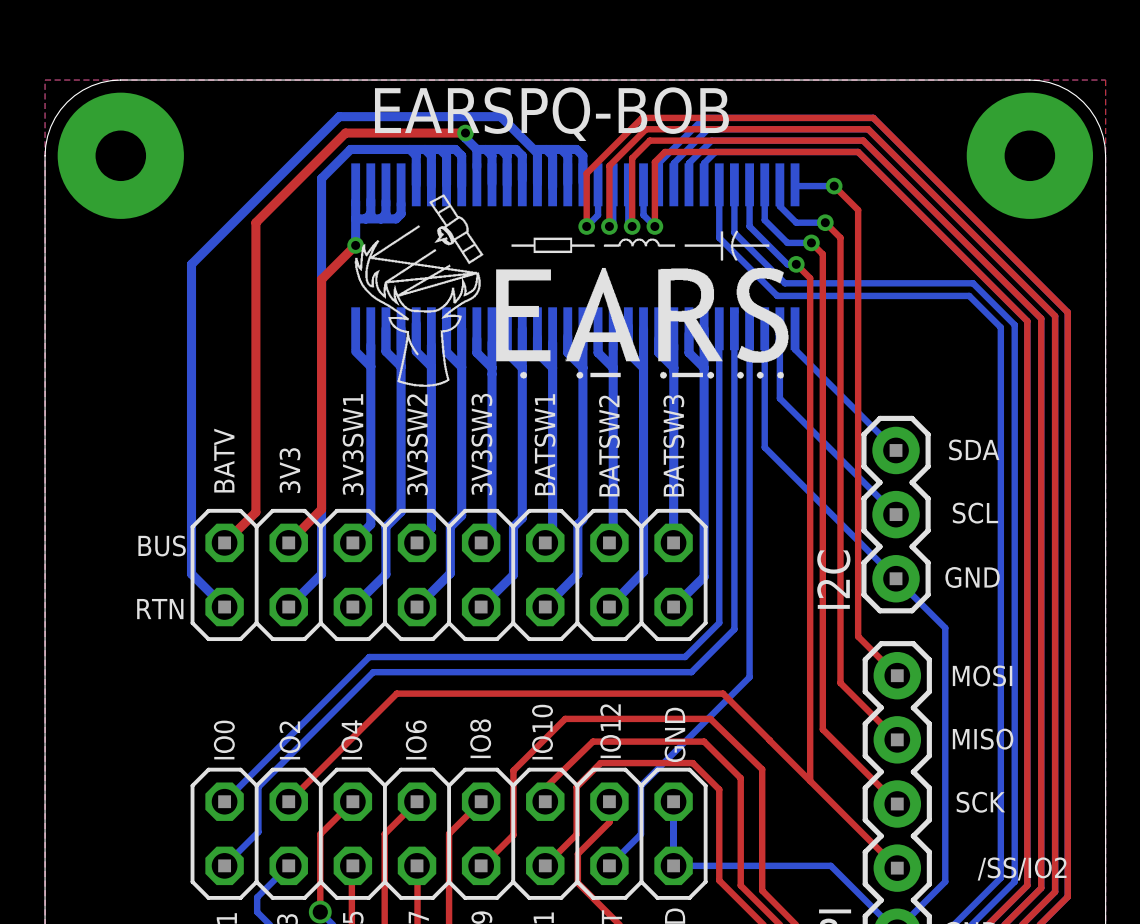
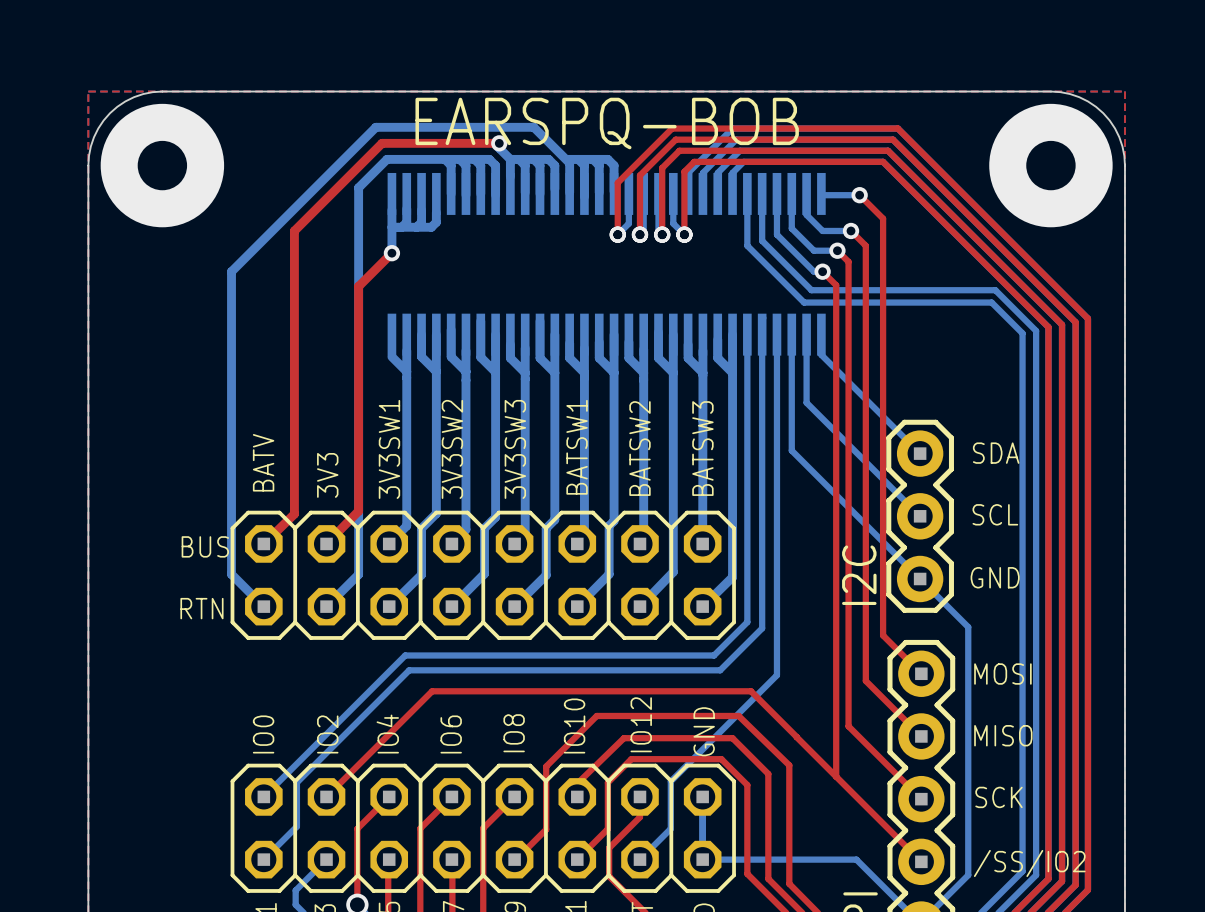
drawing: [354, 194, 789, 387] -> none

